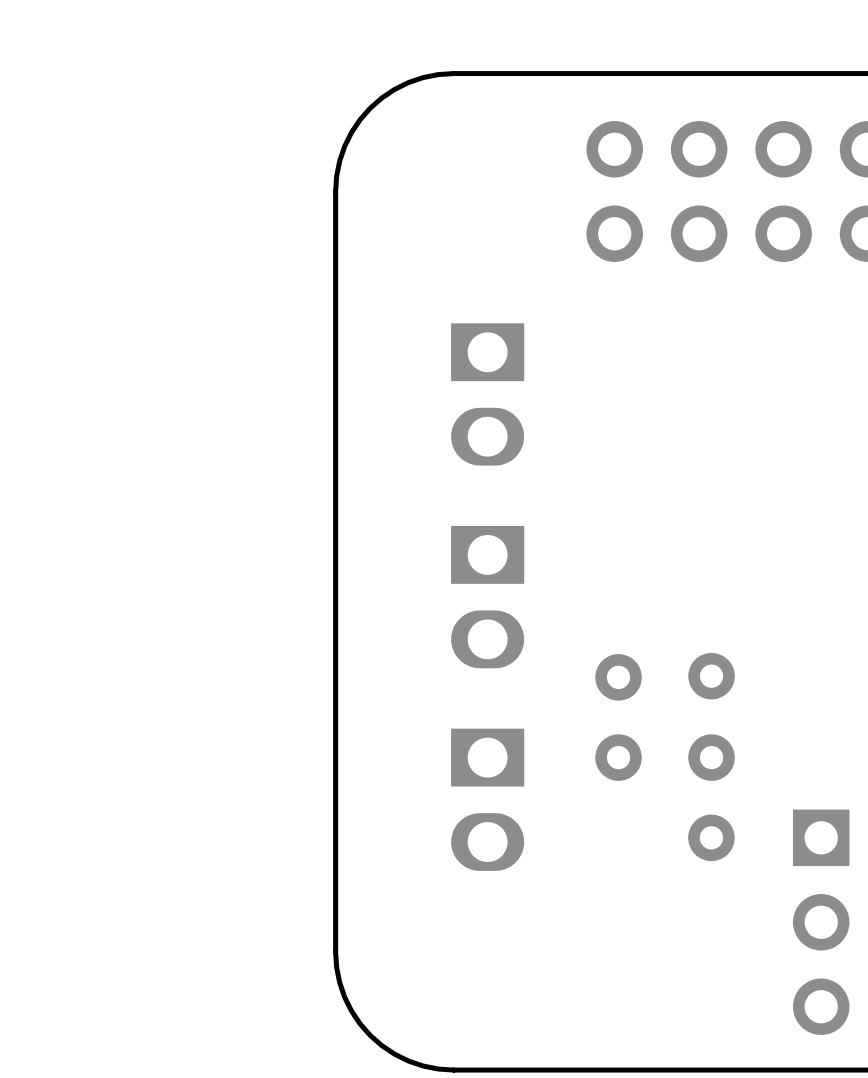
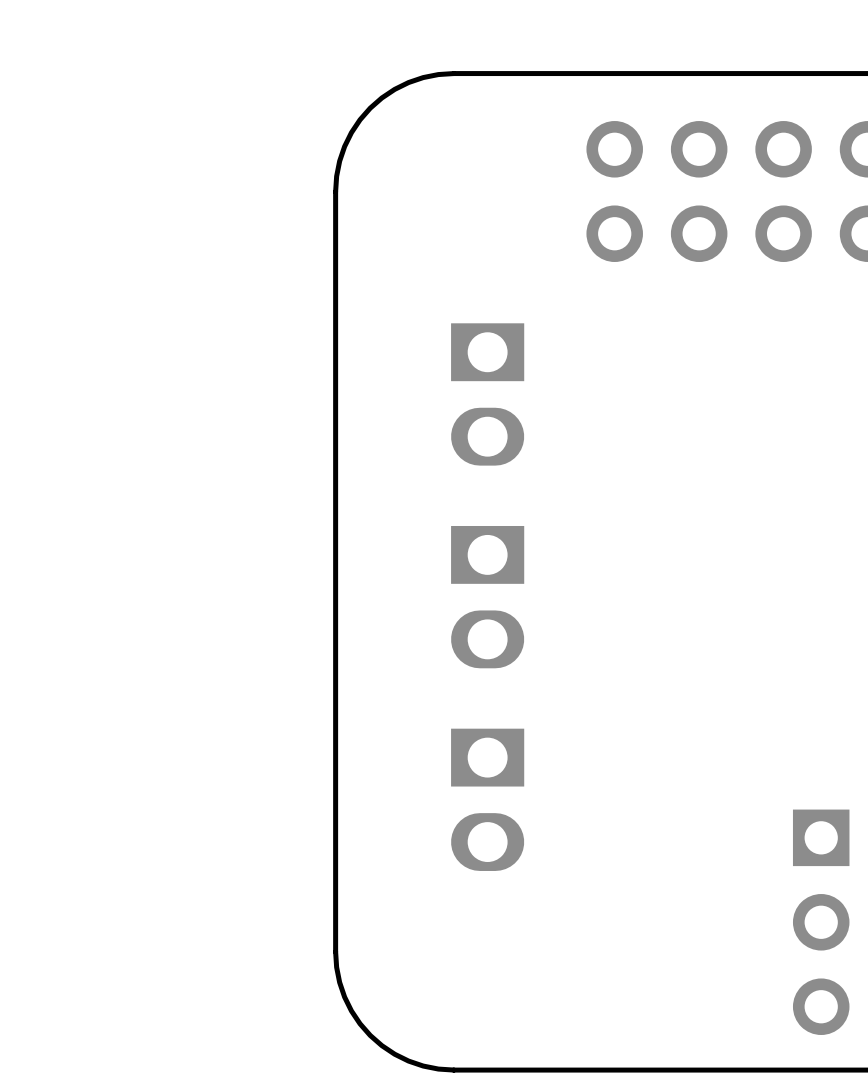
part: (711, 676) -> none
part: (618, 677) -> none
part: (618, 757) -> none
part: (711, 757) -> none
part: (711, 837) -> none

